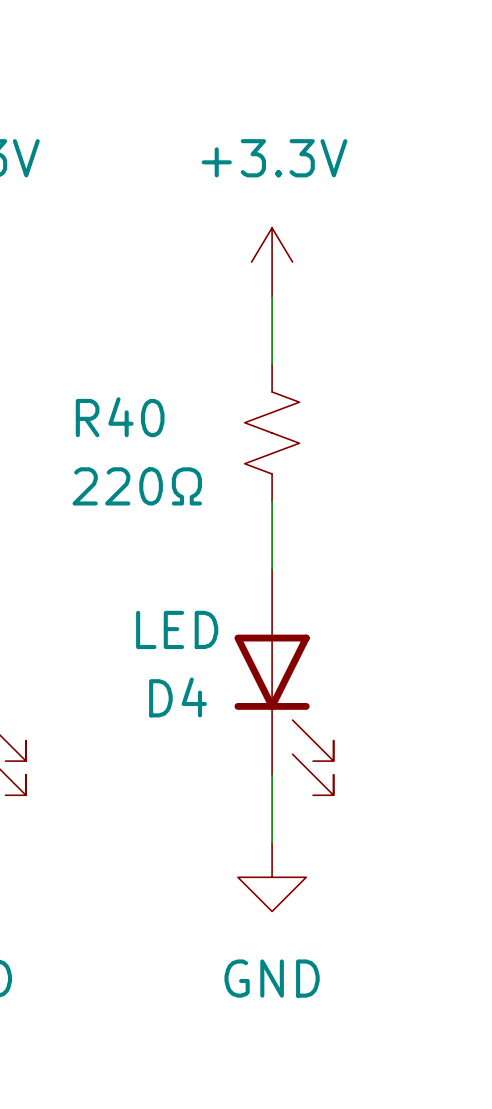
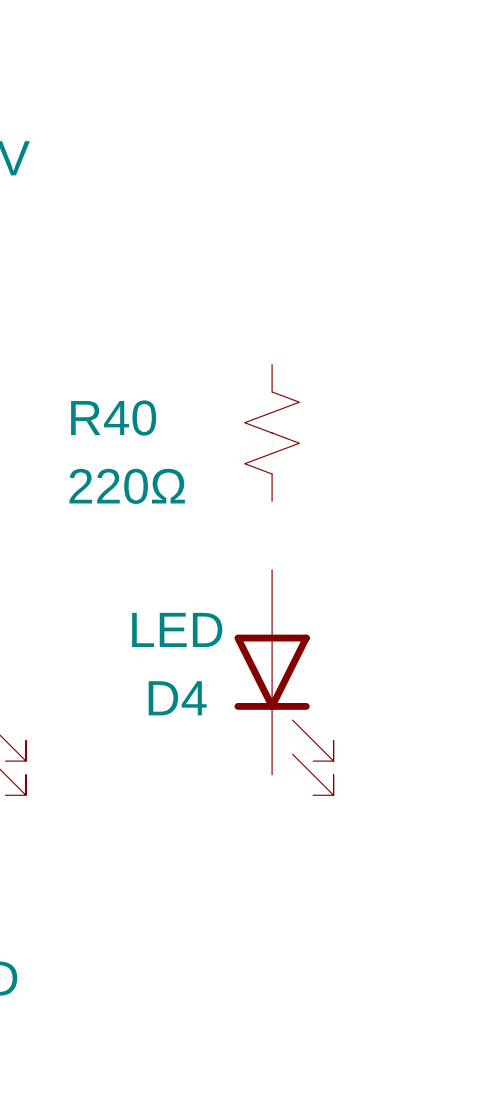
power symbol: +3.3V (272, 262) -> none
wire: (272, 296) (272, 364) -> none
wire: (272, 501) (272, 569) -> none
wire: (272, 774) (272, 843) -> none
power symbol: GND (272, 877) -> none

